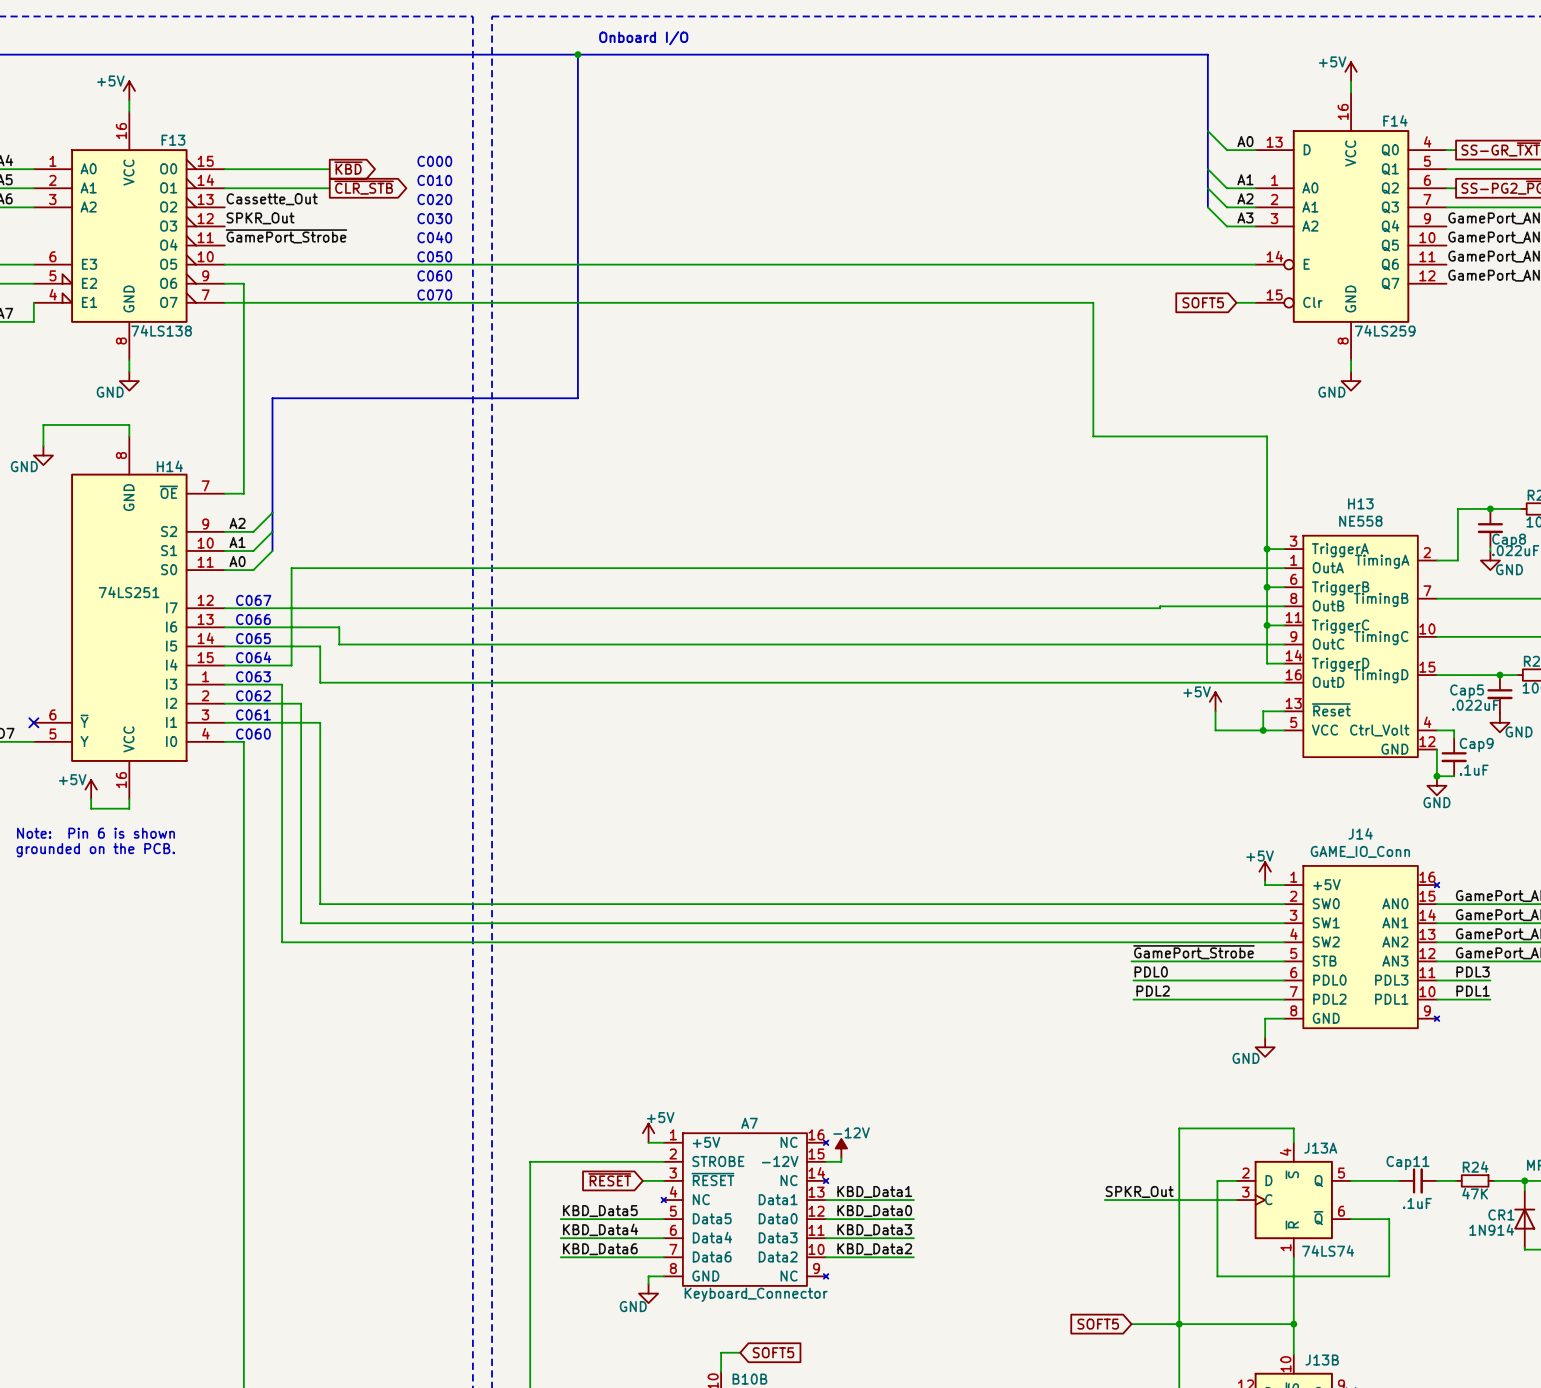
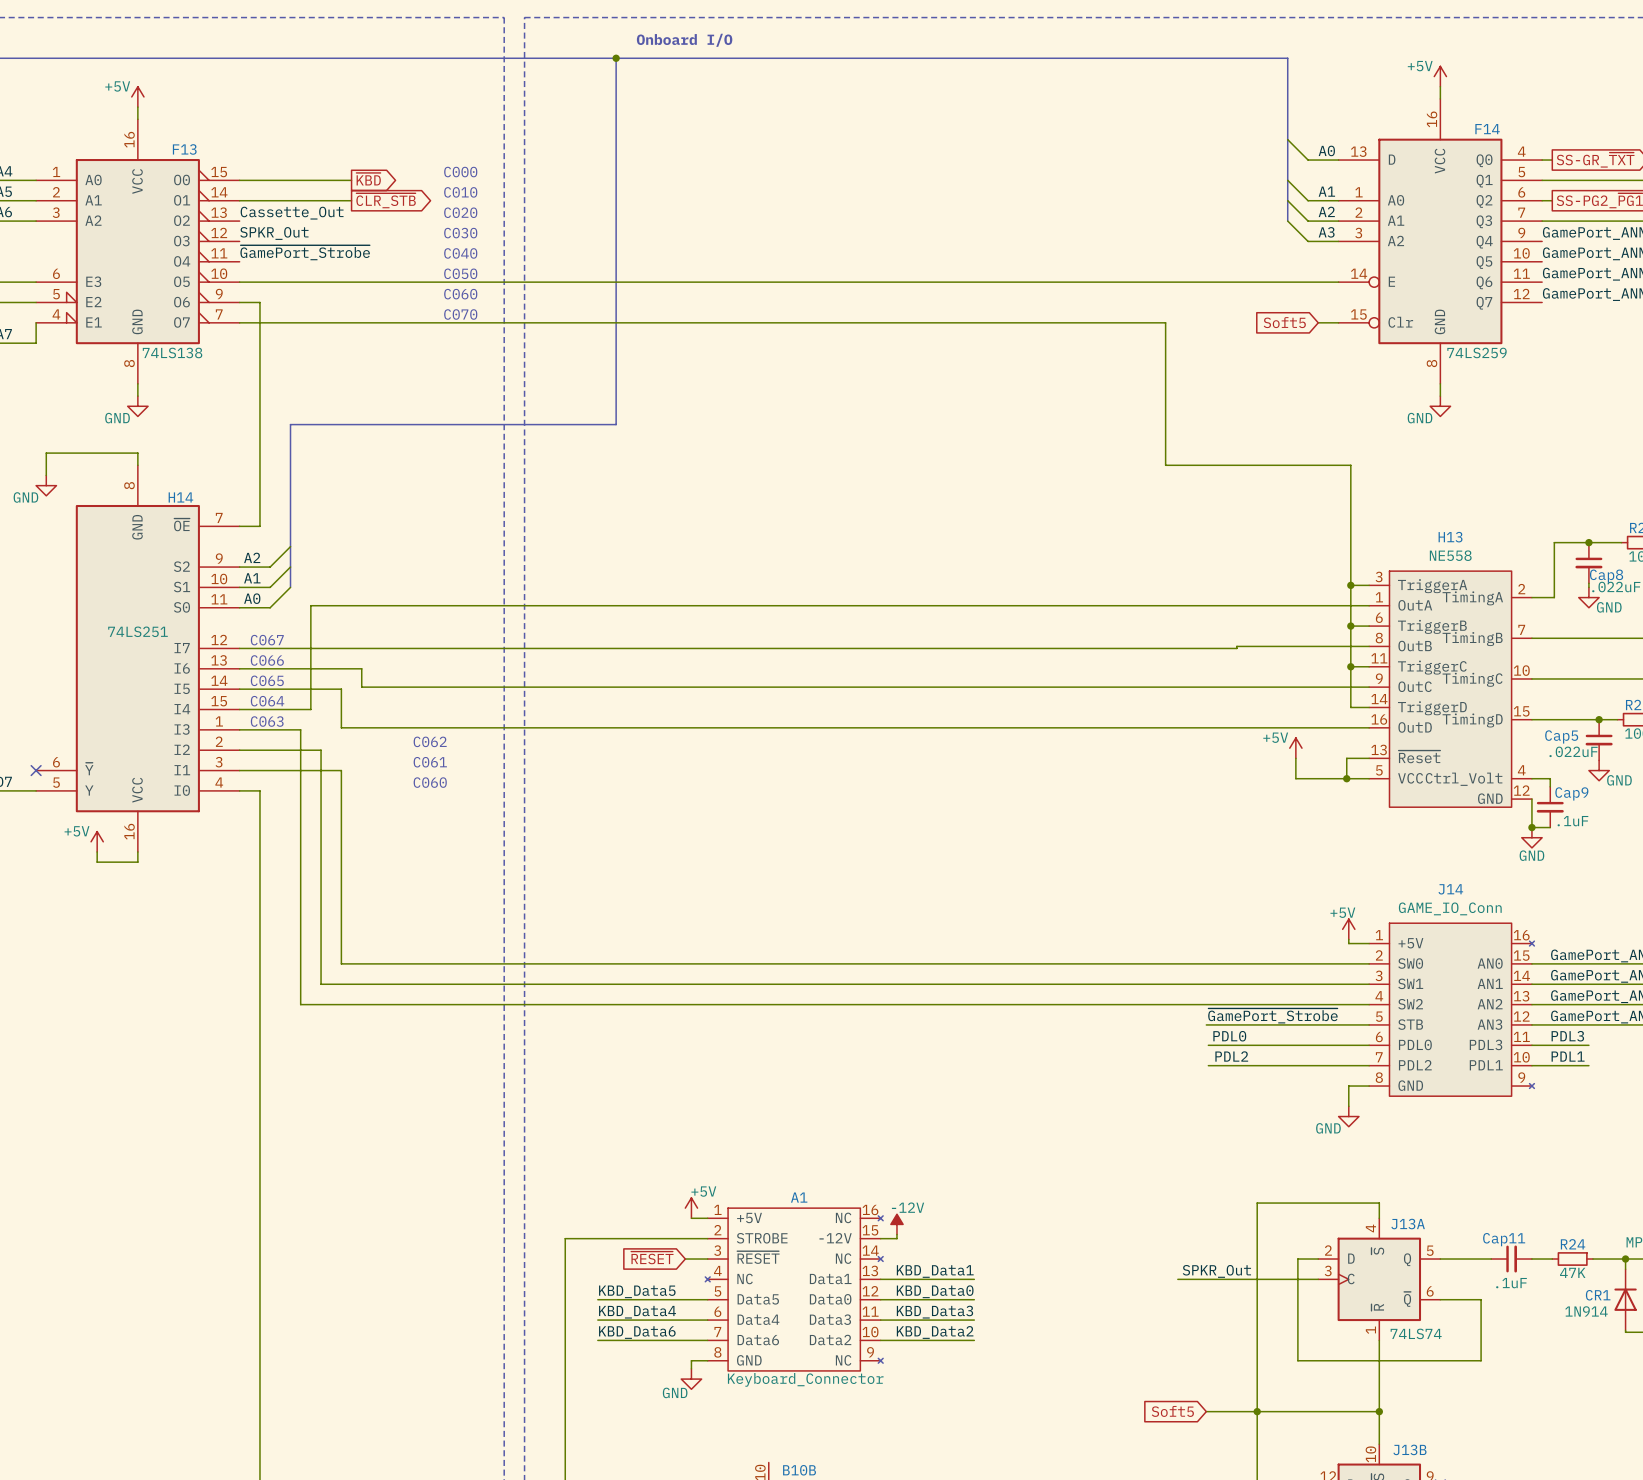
global label: SOFT5 (1203, 302) -> Soft5 (1284, 322)
text position: C062 (253, 695) -> C062 (430, 741)
text position: C061 (253, 714) -> C061 (430, 762)
text position: C060 (253, 734) -> C060 (430, 782)
text: Note: Pin 6 is shown (95, 833) -> none
text: grounded on the PCB. (95, 850) -> none
A7 name: A7 (749, 1123) -> A1 (799, 1197)
global label: SOFT5 (1098, 1324) -> Soft5 (1172, 1411)
wire: (740, 1352) (721, 1352) (721, 1371) -> none
global label: SOFT5 (773, 1352) -> none

